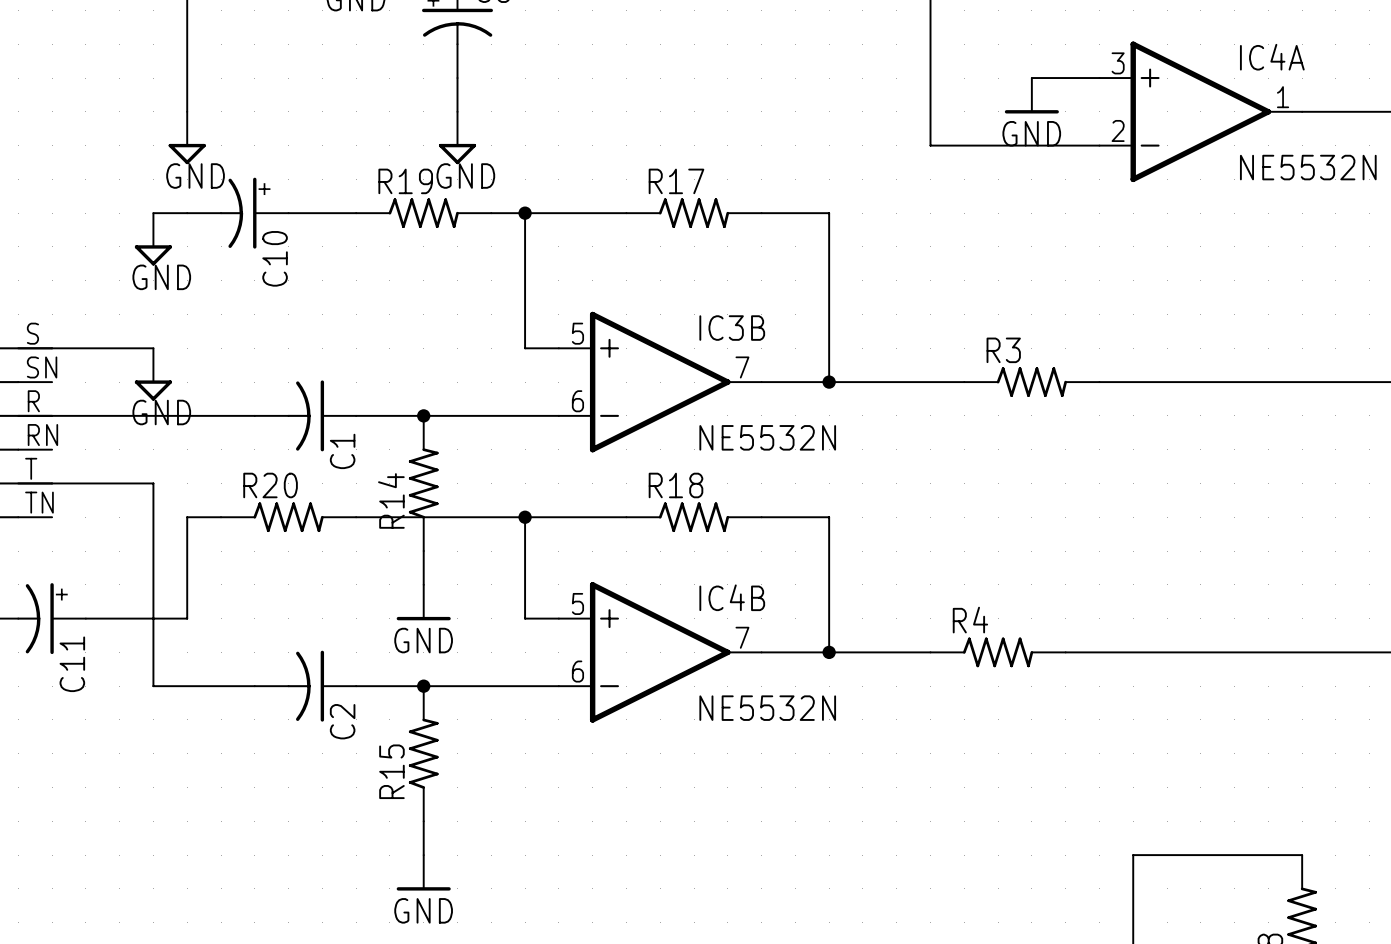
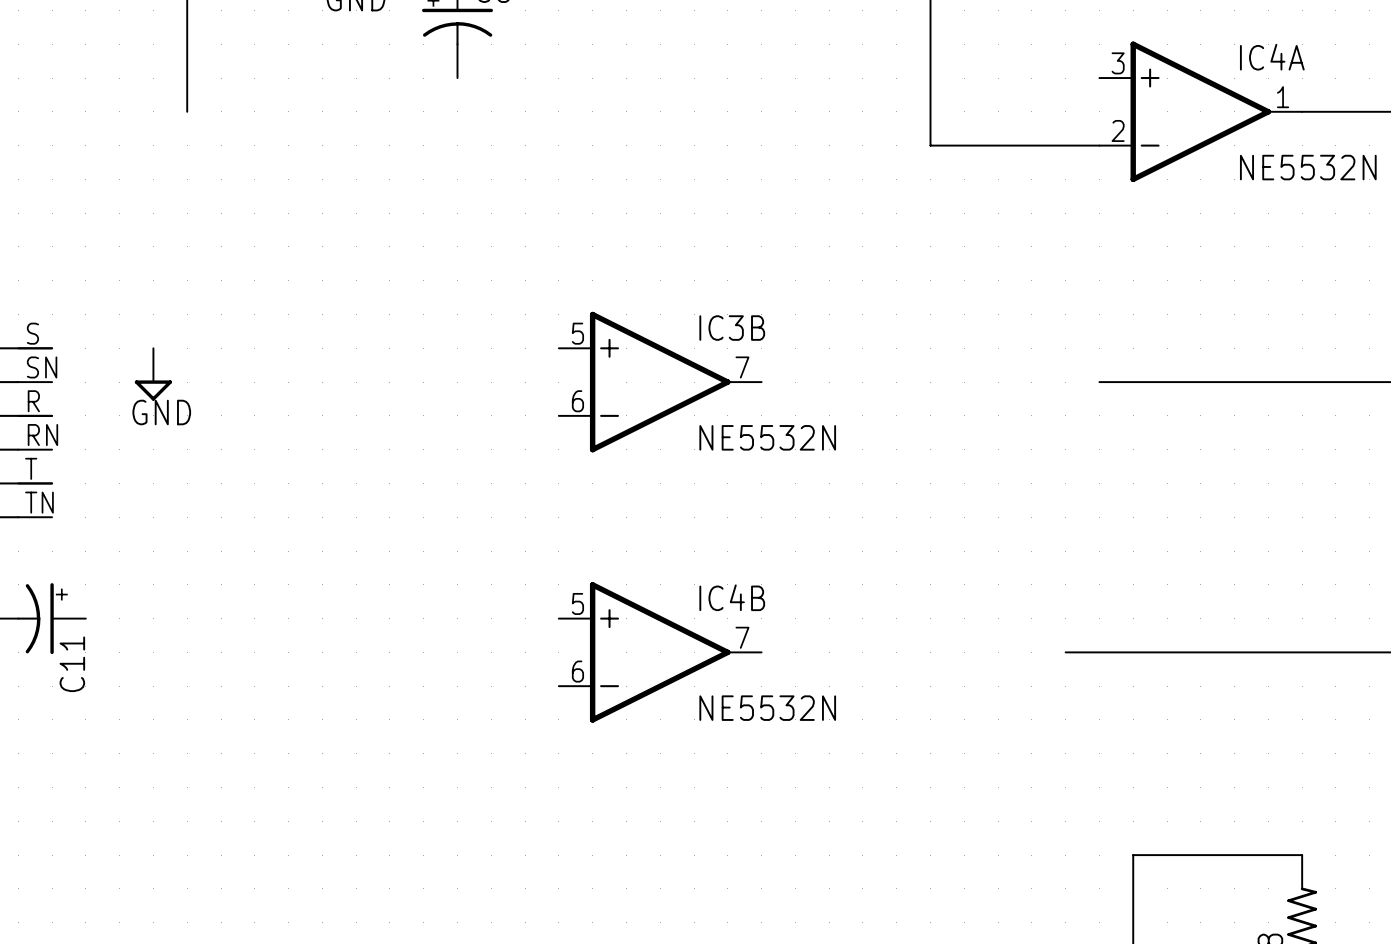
wire: (457, 78) (457, 111) -> none
wire: (1031, 78) (1099, 78) -> none
power symbol: GND (1031, 95) -> none
power symbol: GND (187, 137) -> none
power symbol: GND (457, 137) -> none
wire: (153, 213) (187, 213) -> none
C10: (237, 213) -> none
wire: (288, 213) (356, 213) -> none
R19: (423, 213) -> none
wire: (491, 213) (626, 213) -> none
wire: (525, 213) (525, 348) (558, 348) -> none
junction: (525, 213) -> none
R17: (694, 213) -> none
wire: (761, 213) (829, 213) (829, 382) -> none
power symbol: GND (153, 239) -> none
wire: (52, 348) (153, 348) -> none
wire: (761, 382) (964, 382) -> none
junction: (829, 382) -> none
R3: (1031, 382) -> none
wire: (52, 415) (254, 415) -> none
C1: (305, 415) -> none
wire: (356, 415) (558, 415) -> none
junction: (423, 415) -> none
wire: (52, 483) (153, 483) (153, 686) (254, 686) -> none
R14: (423, 483) -> none
wire: (221, 517) (187, 517) (187, 618) (85, 618) -> none
R20: (288, 517) -> none
wire: (356, 517) (626, 517) -> none
wire: (525, 517) (525, 618) (558, 618) -> none
junction: (525, 517) -> none
R18: (694, 517) -> none
wire: (761, 517) (829, 517) (829, 652) -> none
wire: (423, 551) (423, 584) -> none
power symbol: GND (423, 602) -> none
wire: (761, 652) (930, 652) -> none
junction: (829, 652) -> none
R4: (998, 652) -> none
C2: (305, 686) -> none
wire: (356, 686) (558, 686) -> none
junction: (423, 686) -> none
R15: (423, 753) -> none
wire: (423, 821) (423, 855) -> none
power symbol: GND (423, 872) -> none

